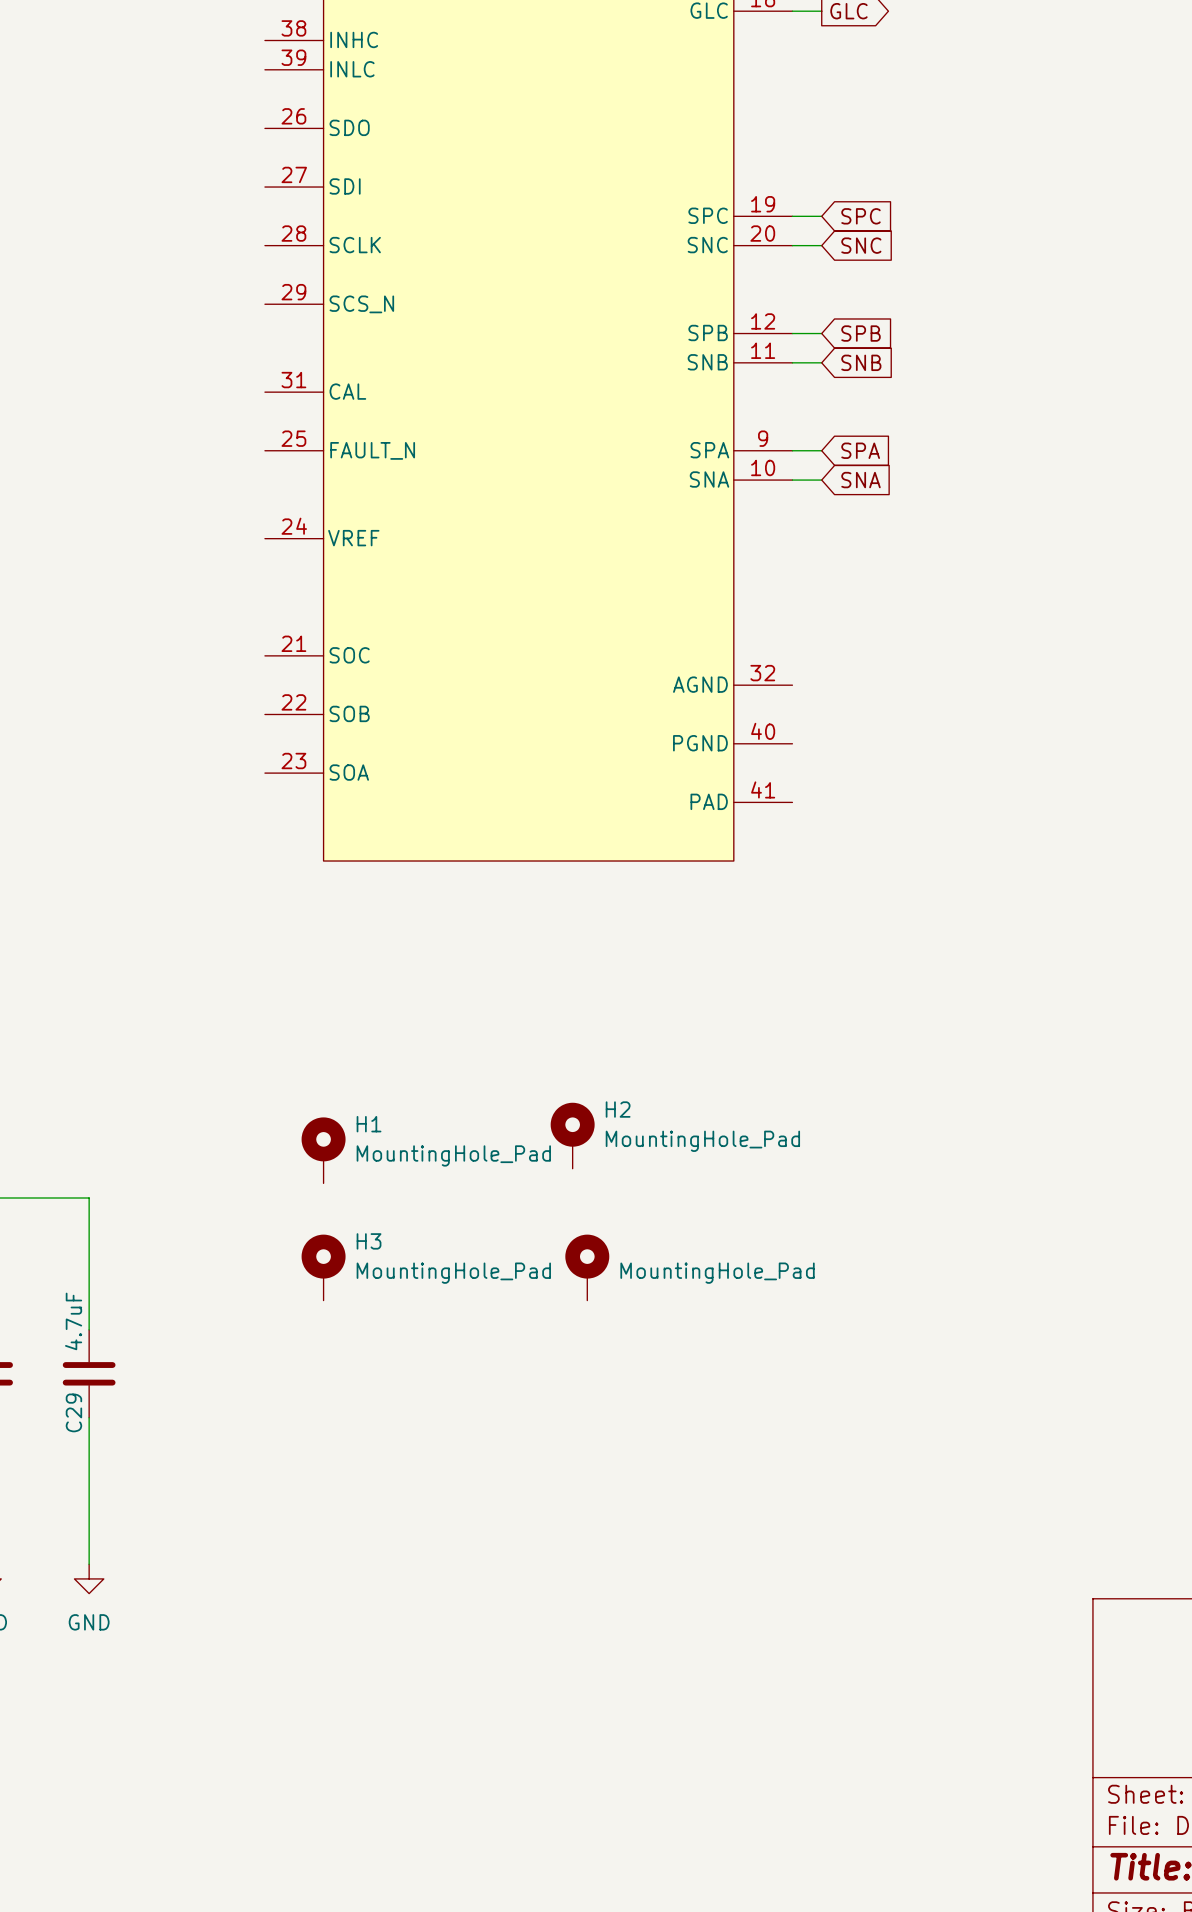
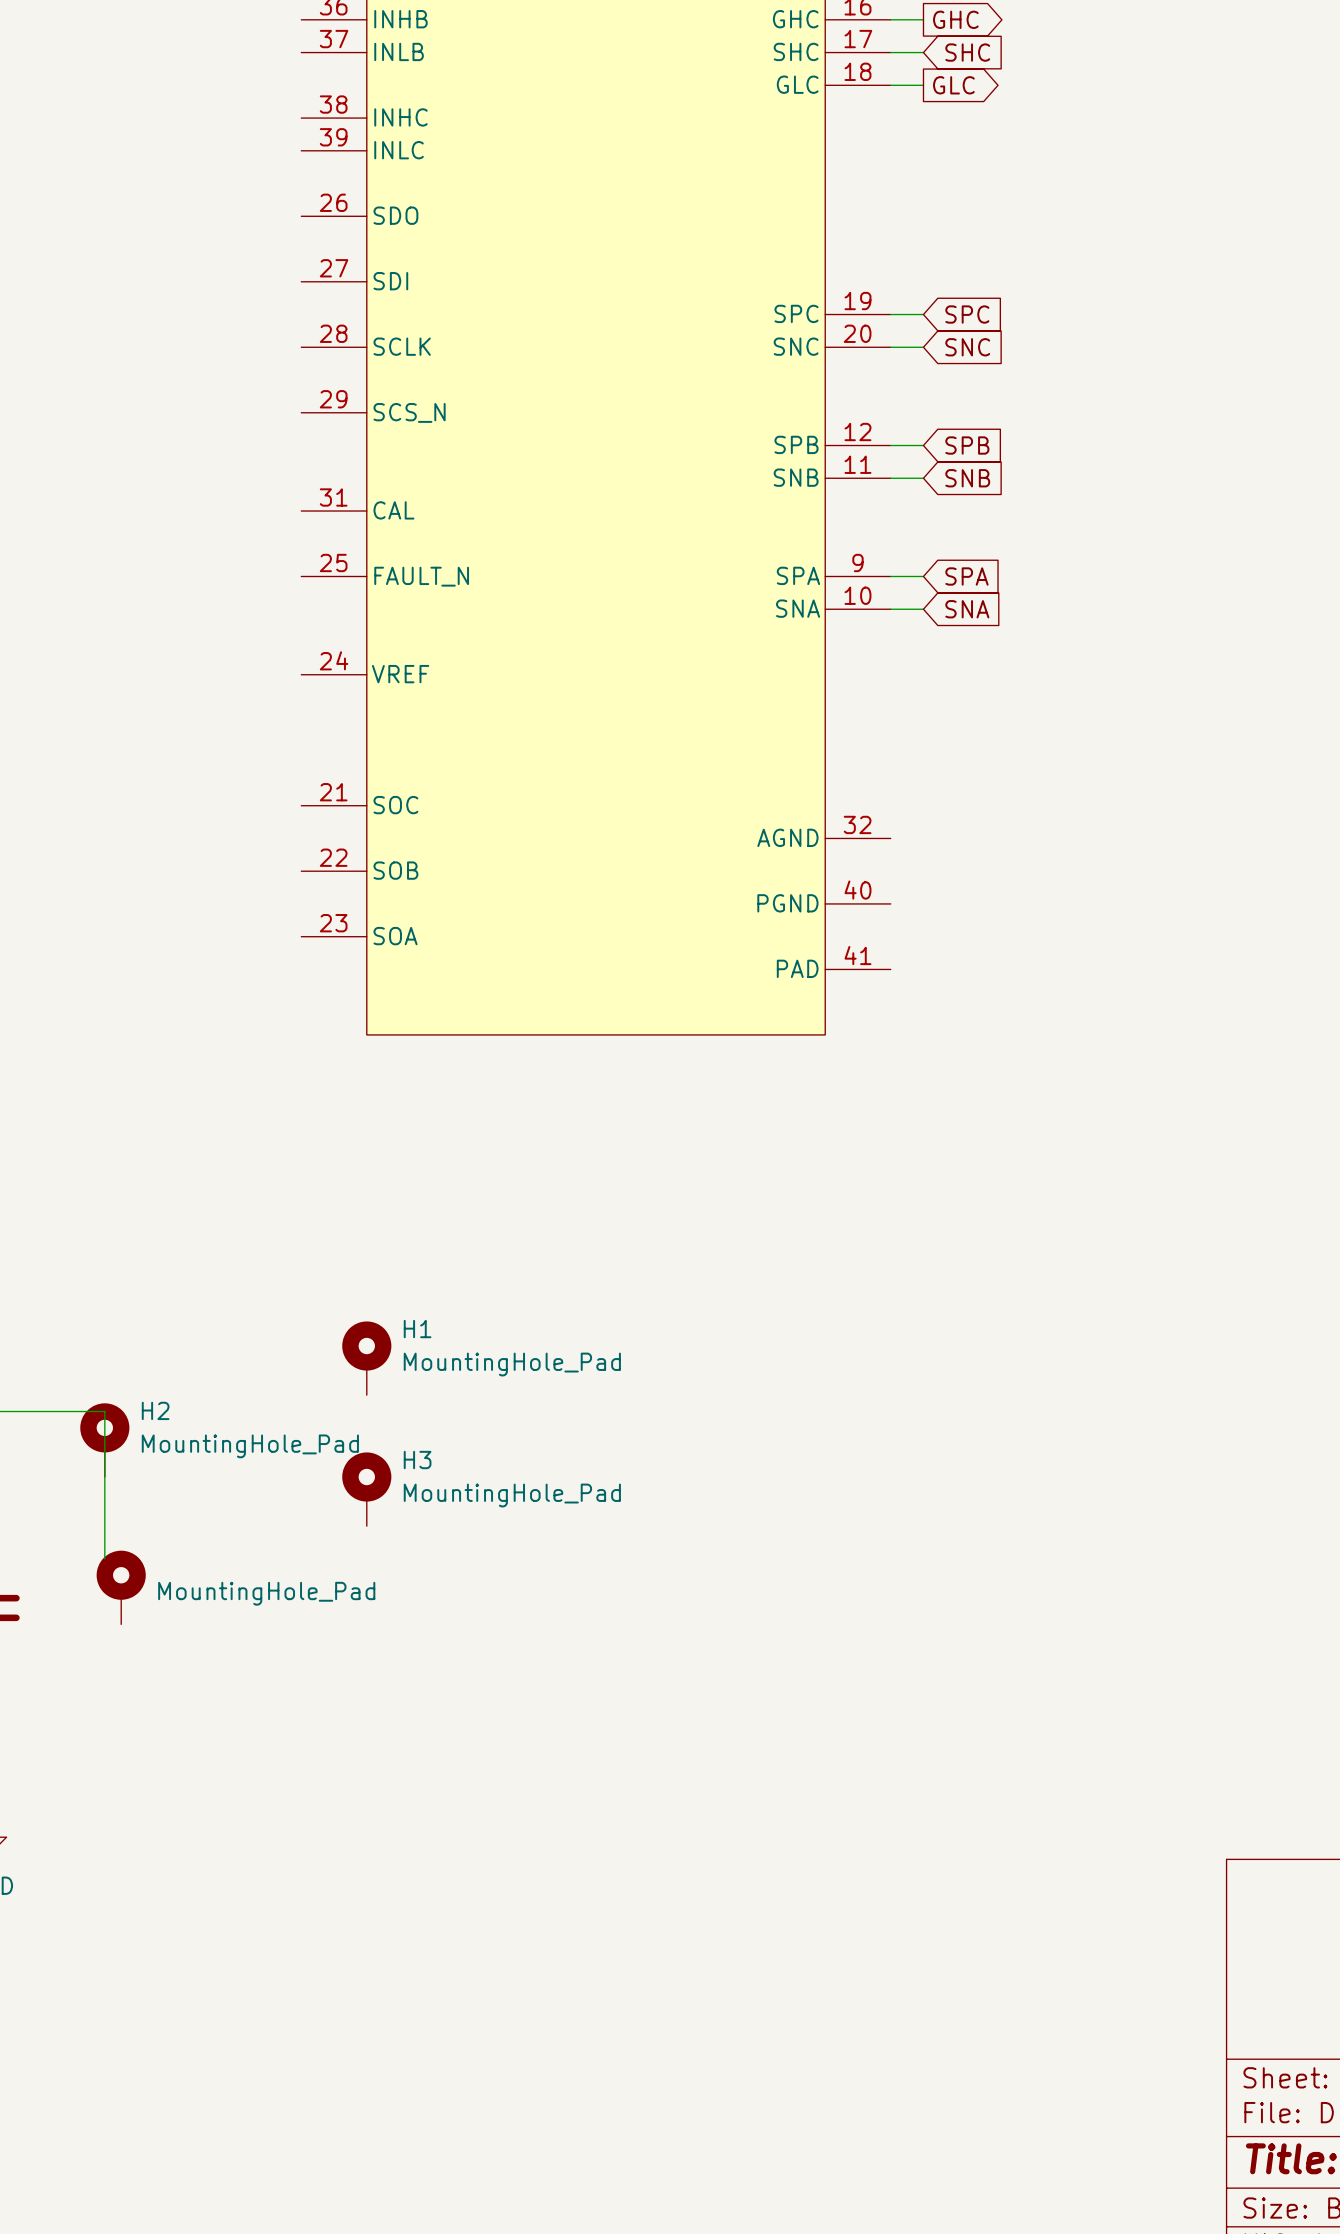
H2 position: (572, 1135) -> (104, 1440)
part: MountingHole_Pad (587, 1267) -> none
part: none -> MountingHole_Pad (121, 1587)
C29: 4.7uF (89, 1373) -> none
wire: (89, 1417) (89, 1564) -> none
power symbol: GND (89, 1578) -> none

